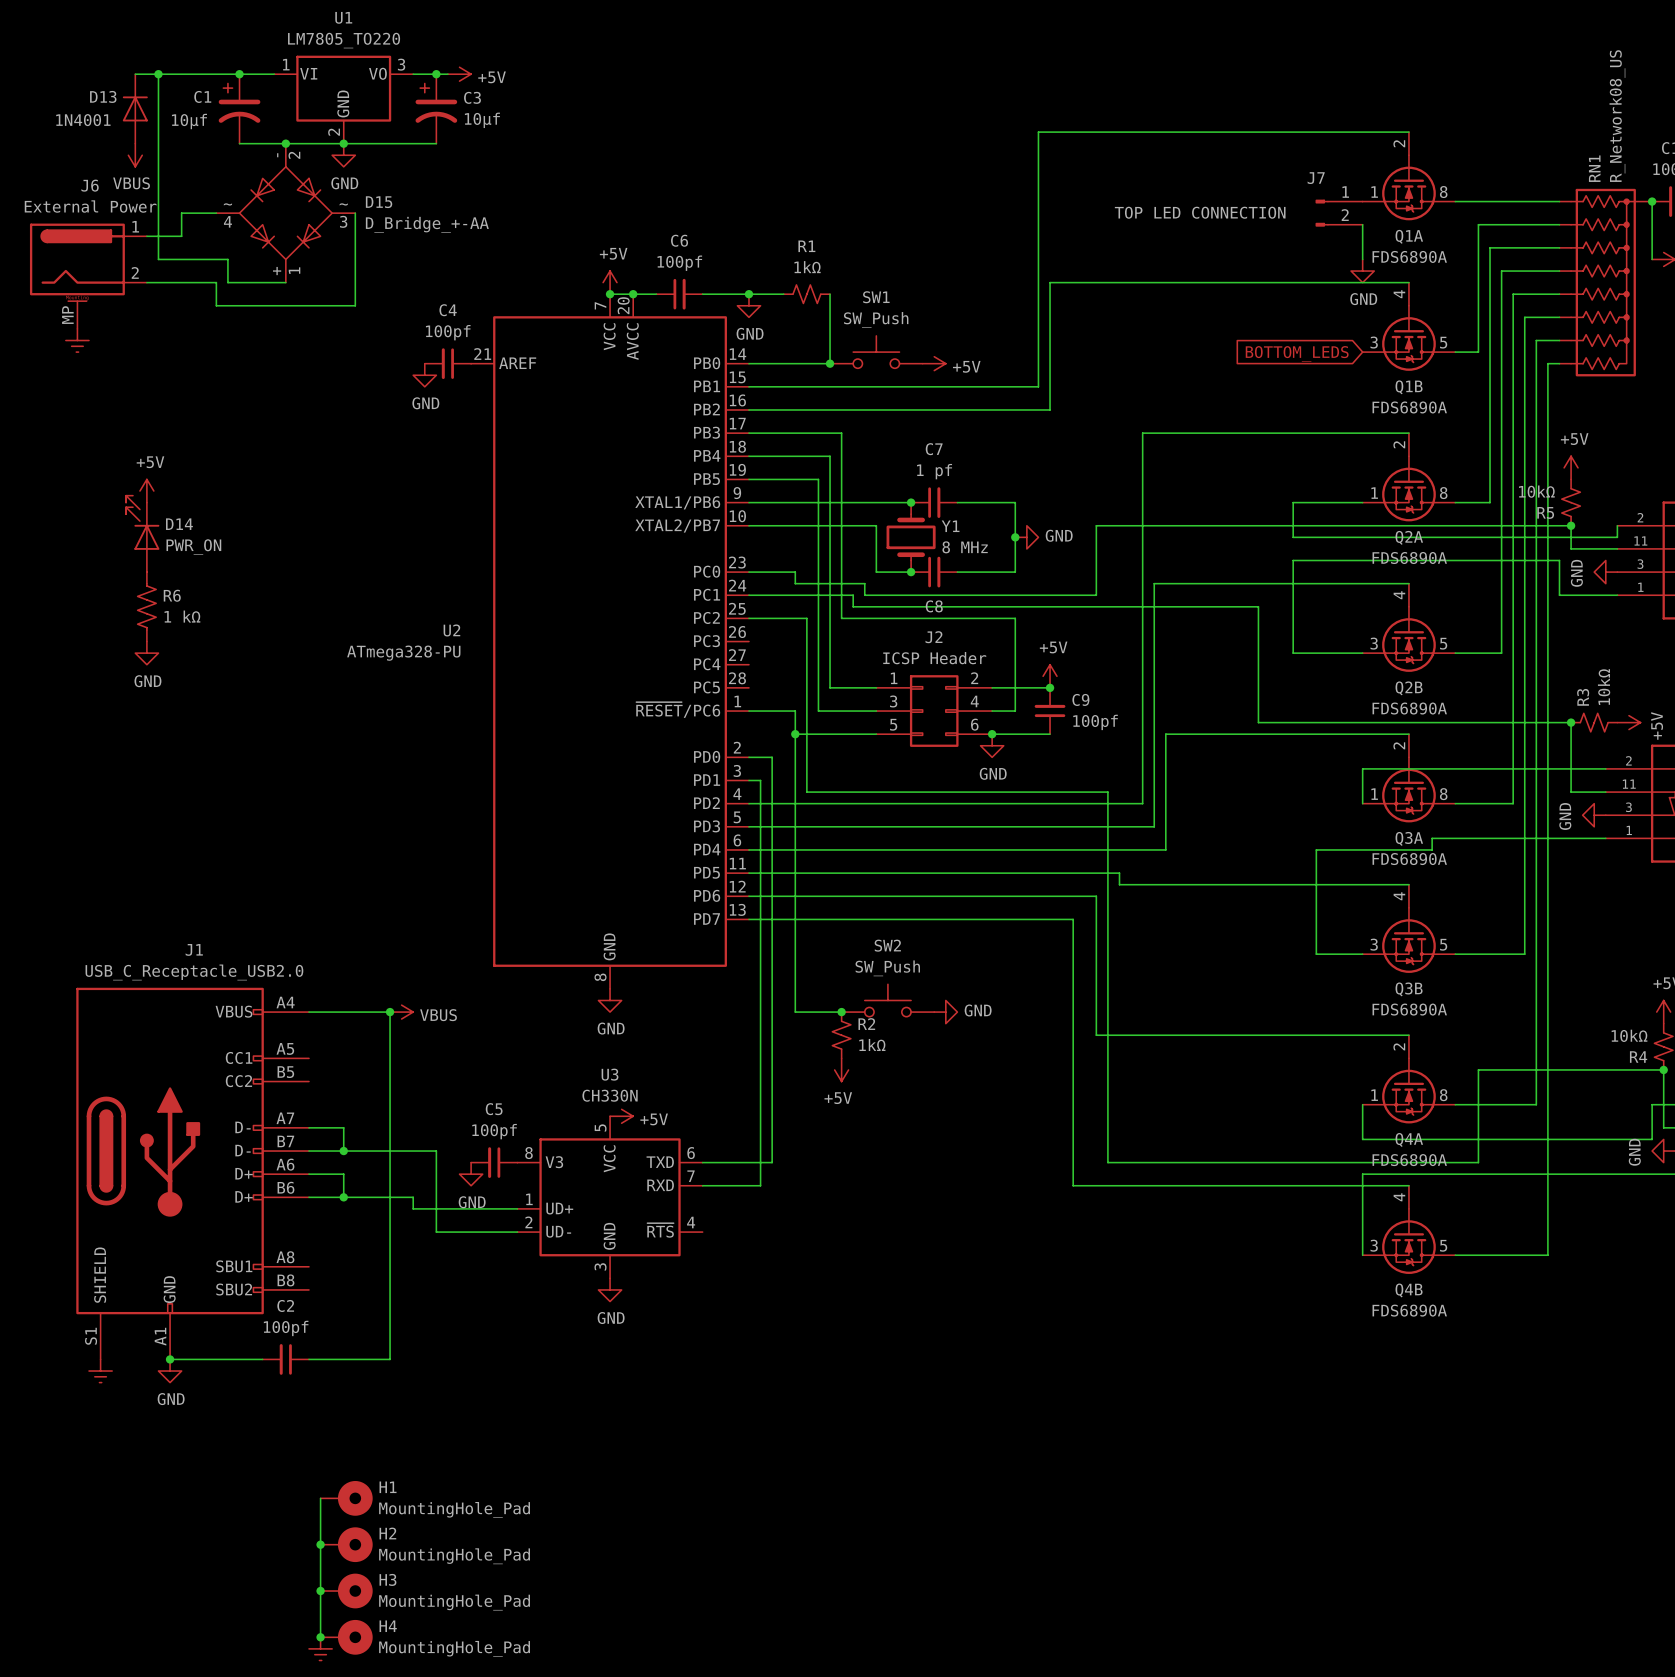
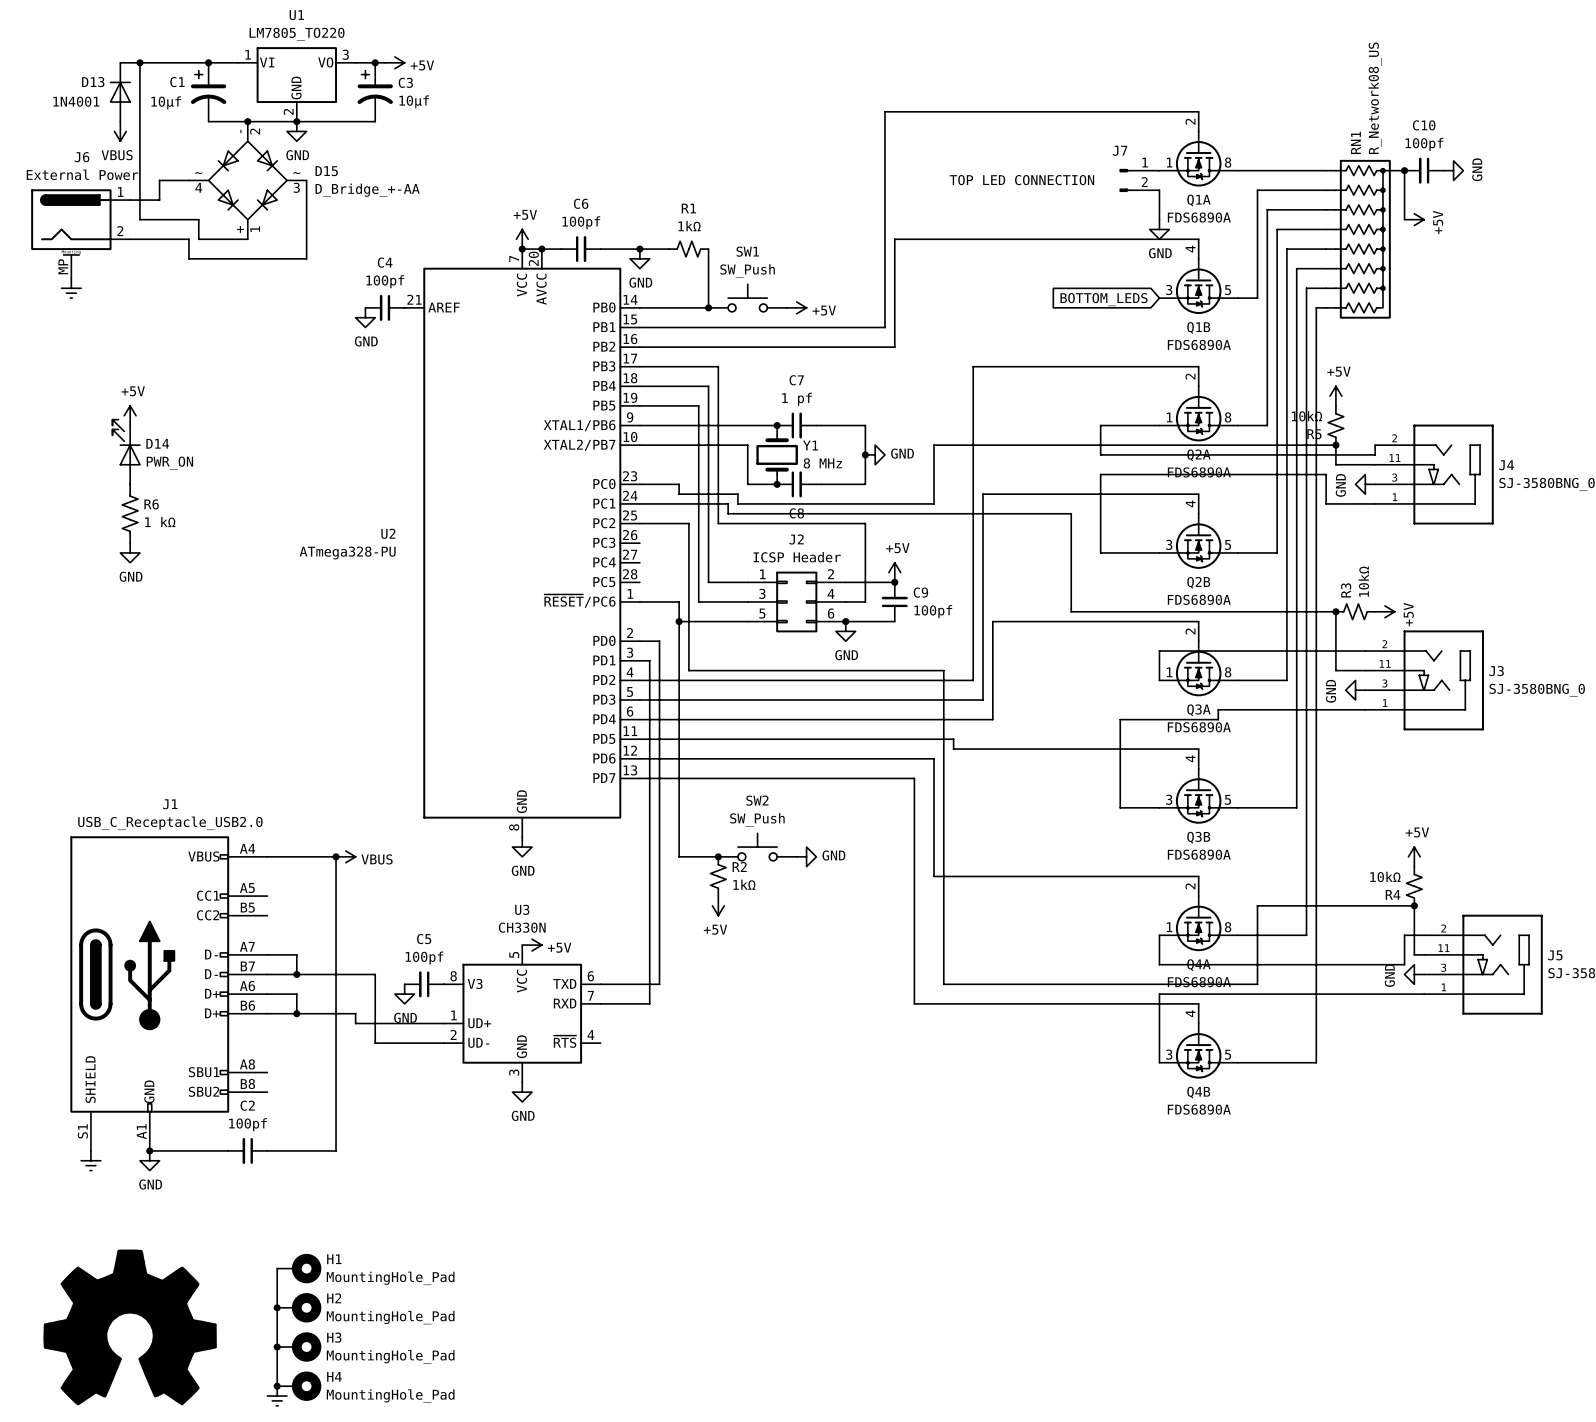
part: none -> (130, 1327)

